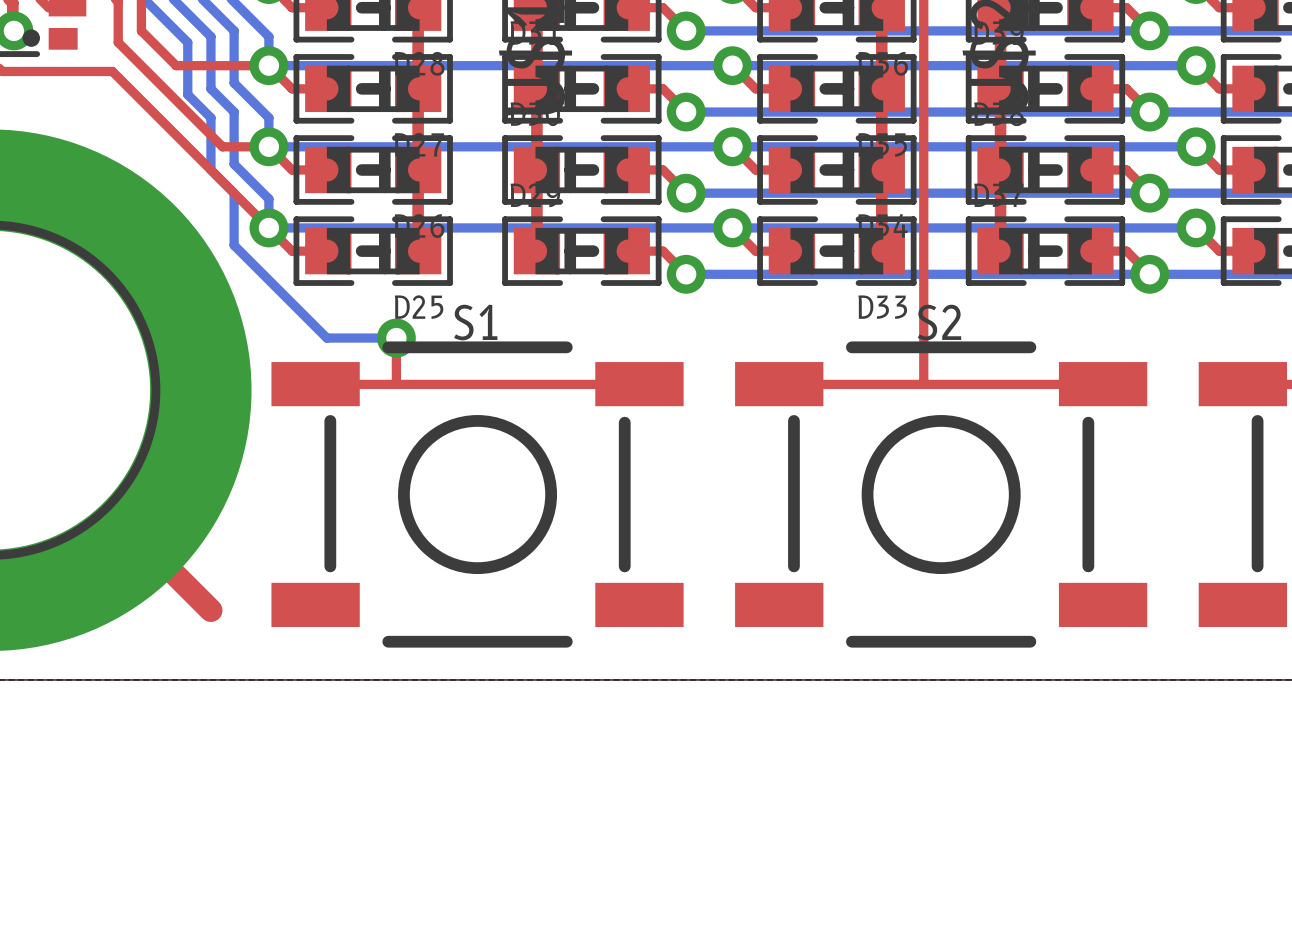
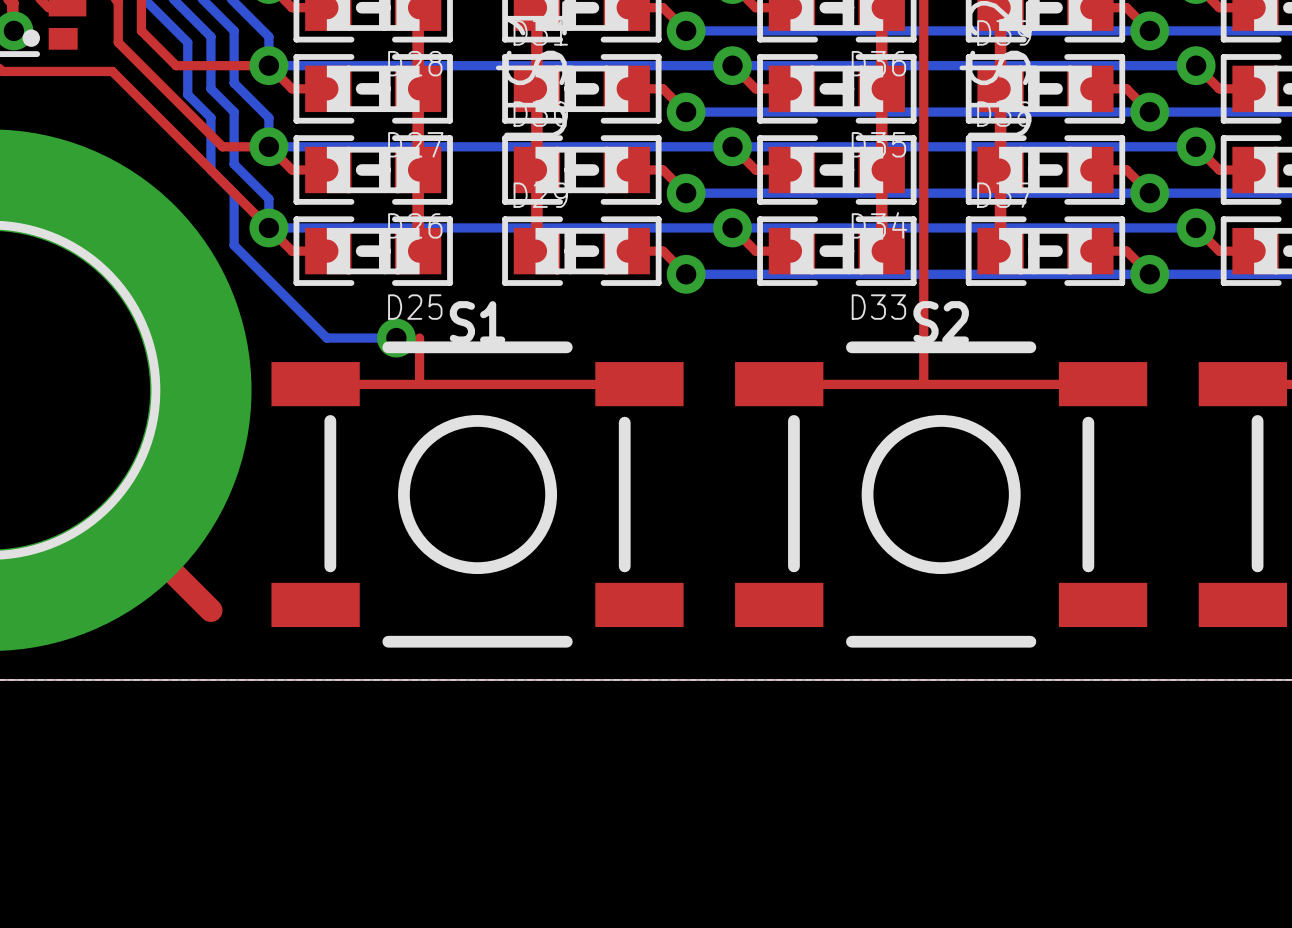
top track: (396, 338) (396, 384) -> (419, 338) (419, 384)

